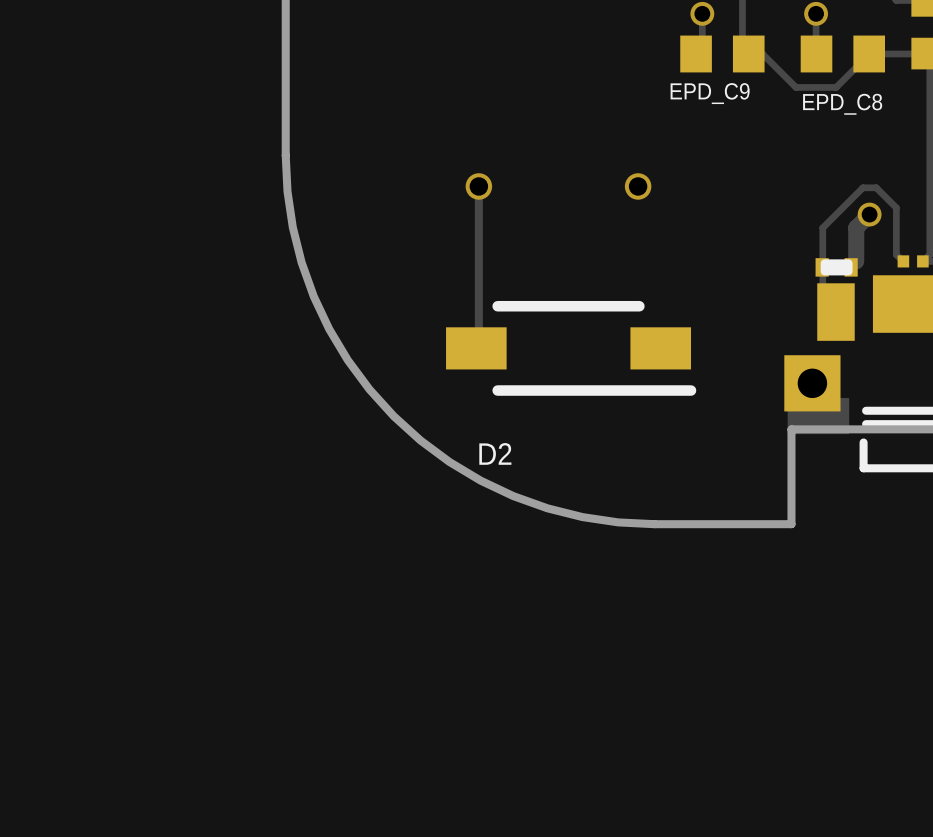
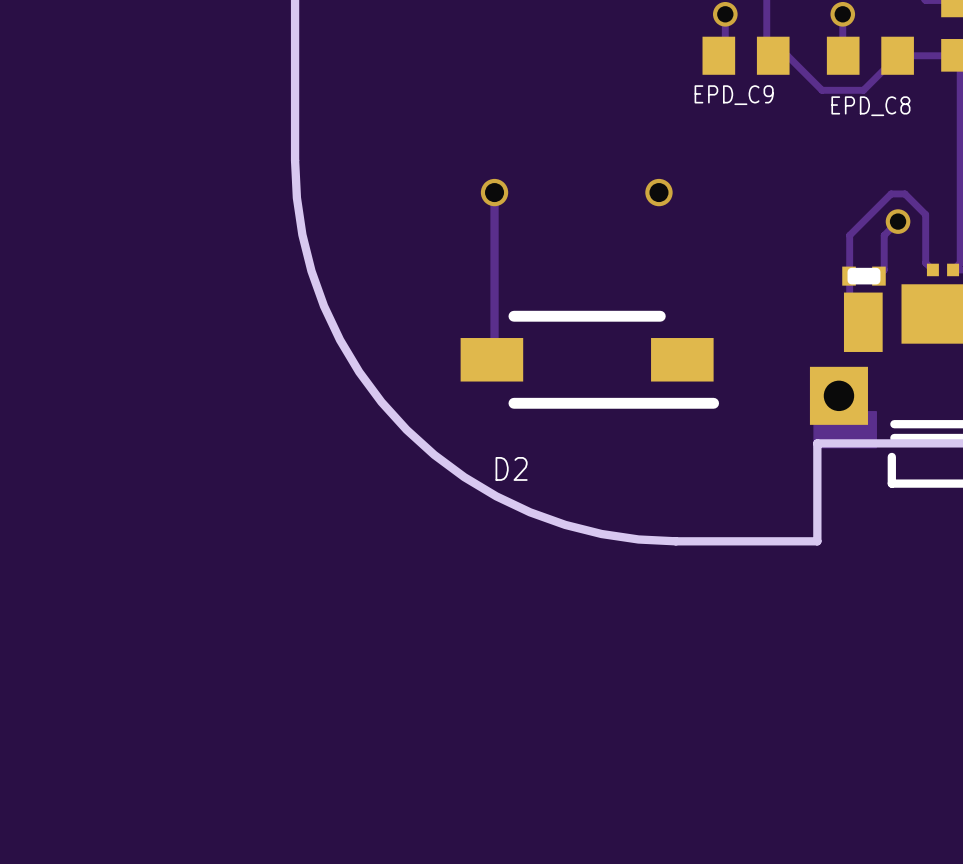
track width: thick (869, 214) (856, 227) (856, 261) -> thin (898, 221) (884, 235) (884, 269)

